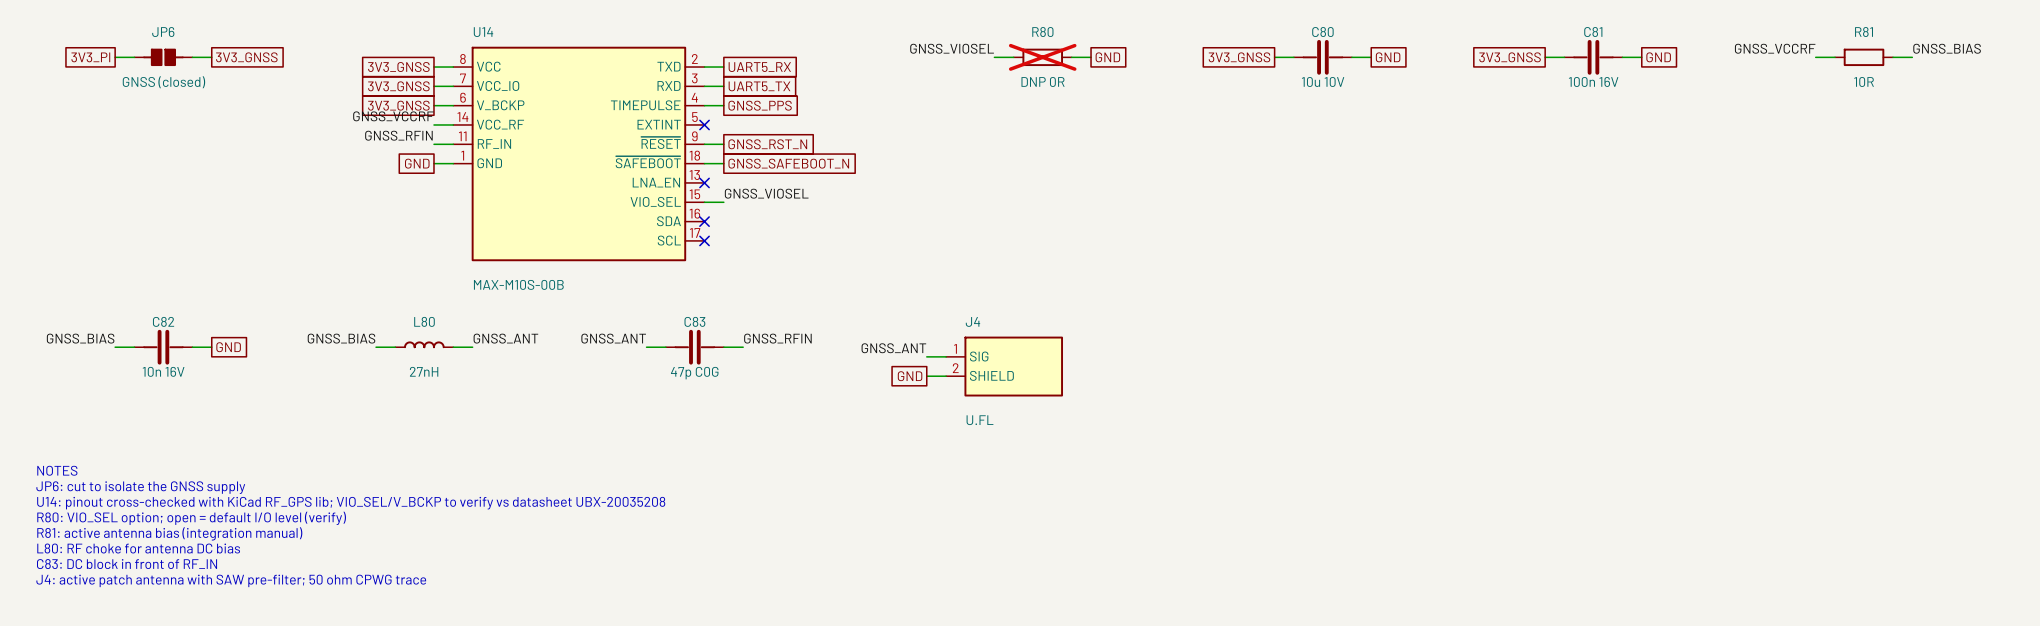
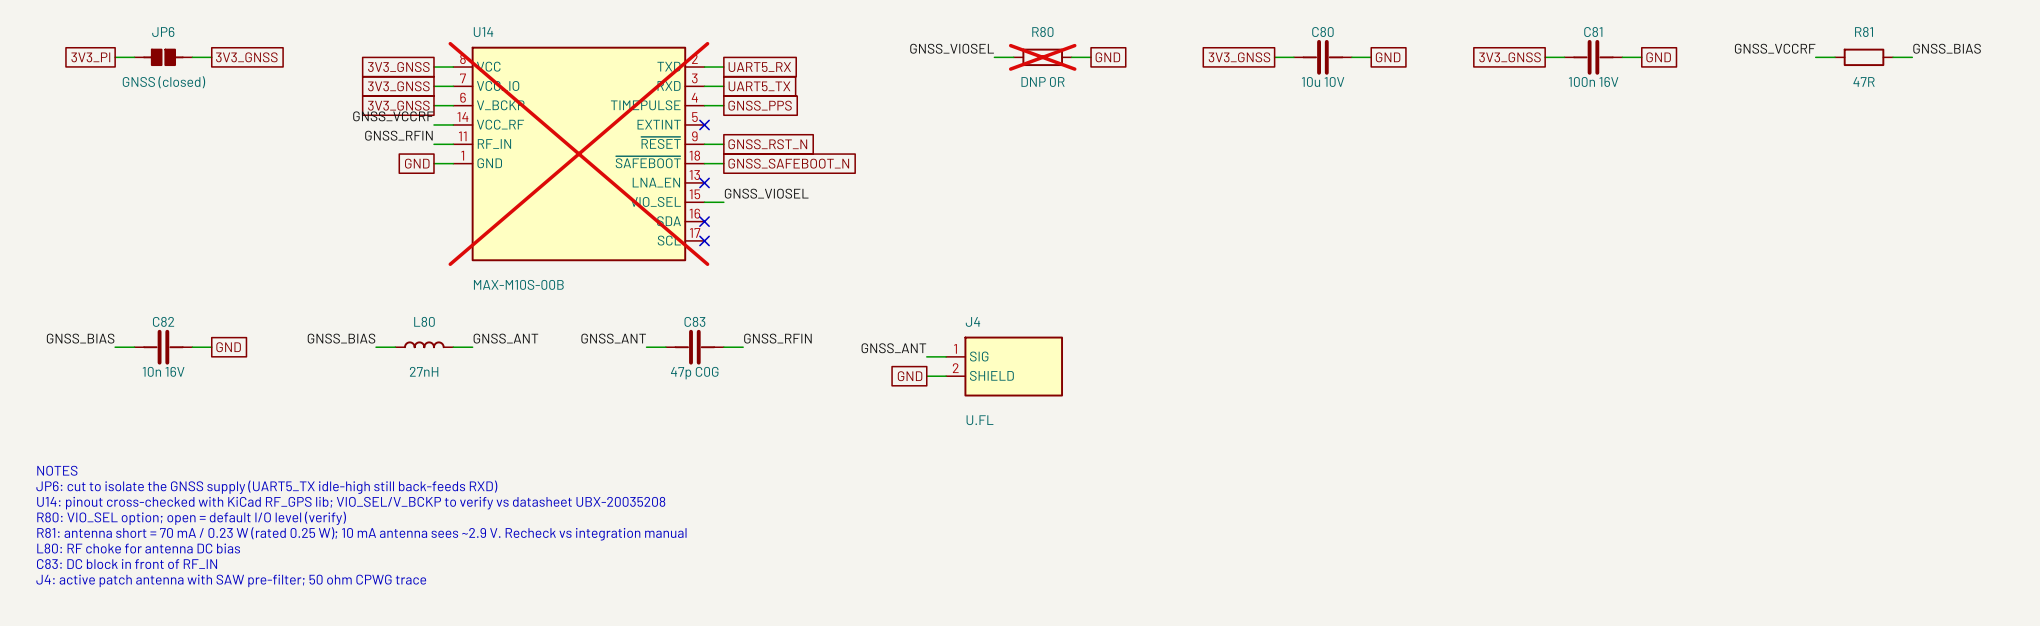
R81 value: 10R (1864, 81) -> 47R (1864, 81)
U14 do-not-place cross: none -> (578, 153)
text: JP6: cut to isolate the GNSS supply (140, 487) -> JP6: cut to isolate the GNSS supply (UART5_TX idle-high still back-feeds RXD) (266, 487)
text: R81: active antenna bias (integration manual) (169, 533) -> R81: antenna short = 70 mA / 0.23 W (rated 0.25 W); 10 mA antenna sees ~2.9 V. Recheck vs integration manual (361, 533)

